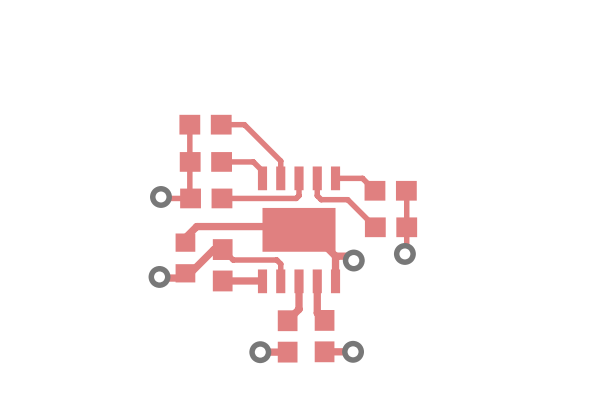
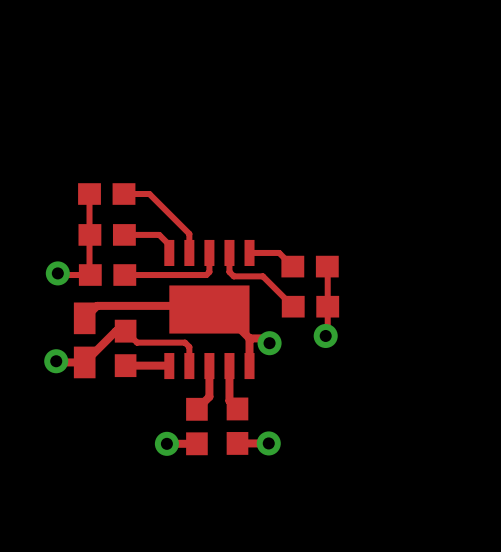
part footprint: [175, 233, 196, 283] -> [73, 302, 96, 379]

